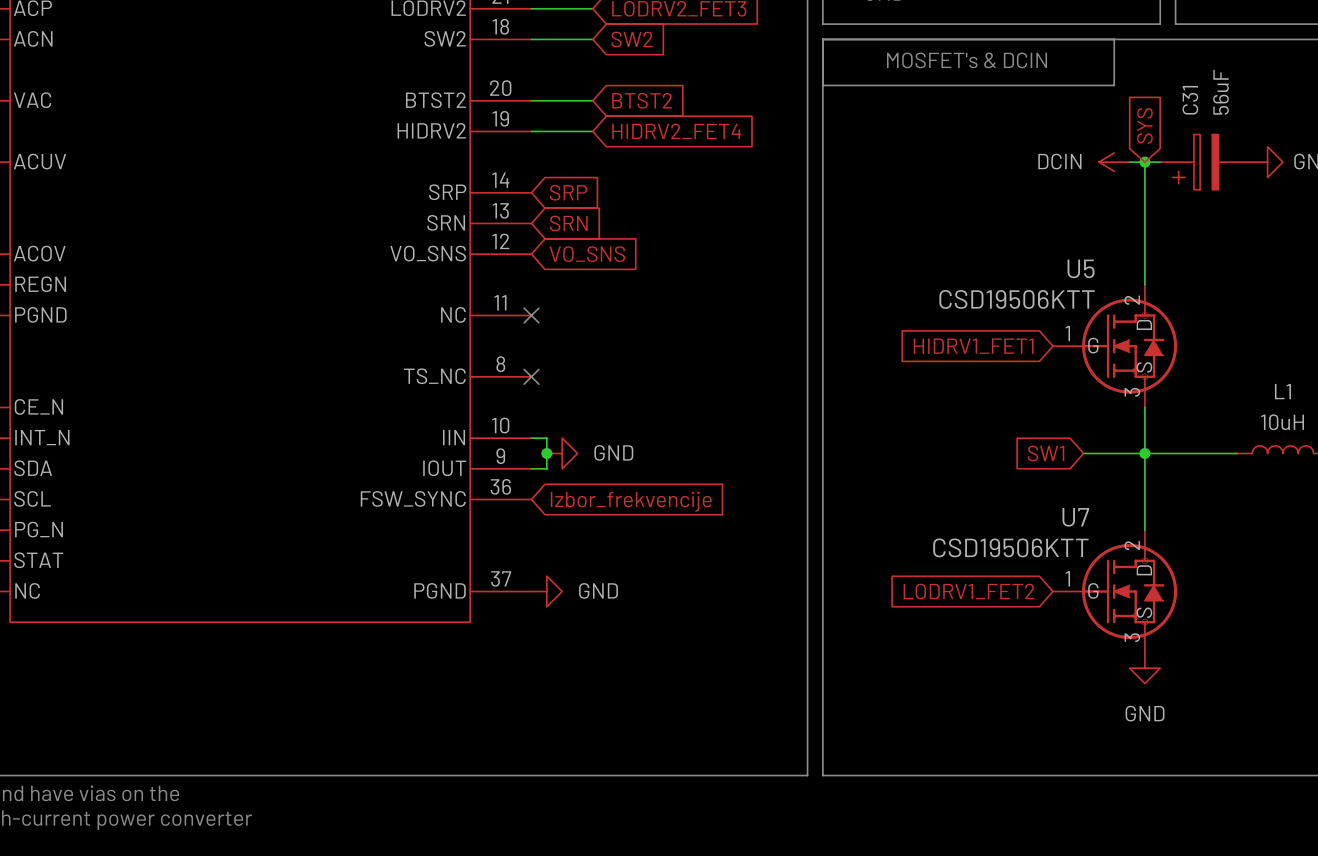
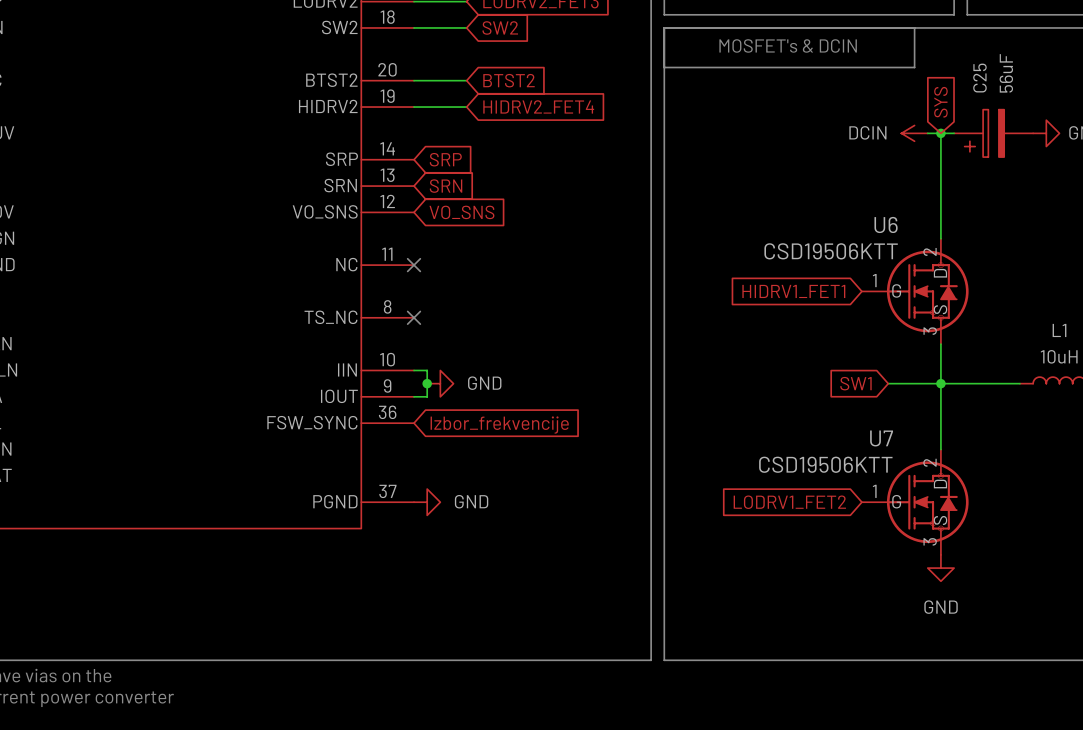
C31 name: C31 (1190, 100) -> C25 (979, 78)
U5 name: U5 (1081, 268) -> U6 (886, 224)

